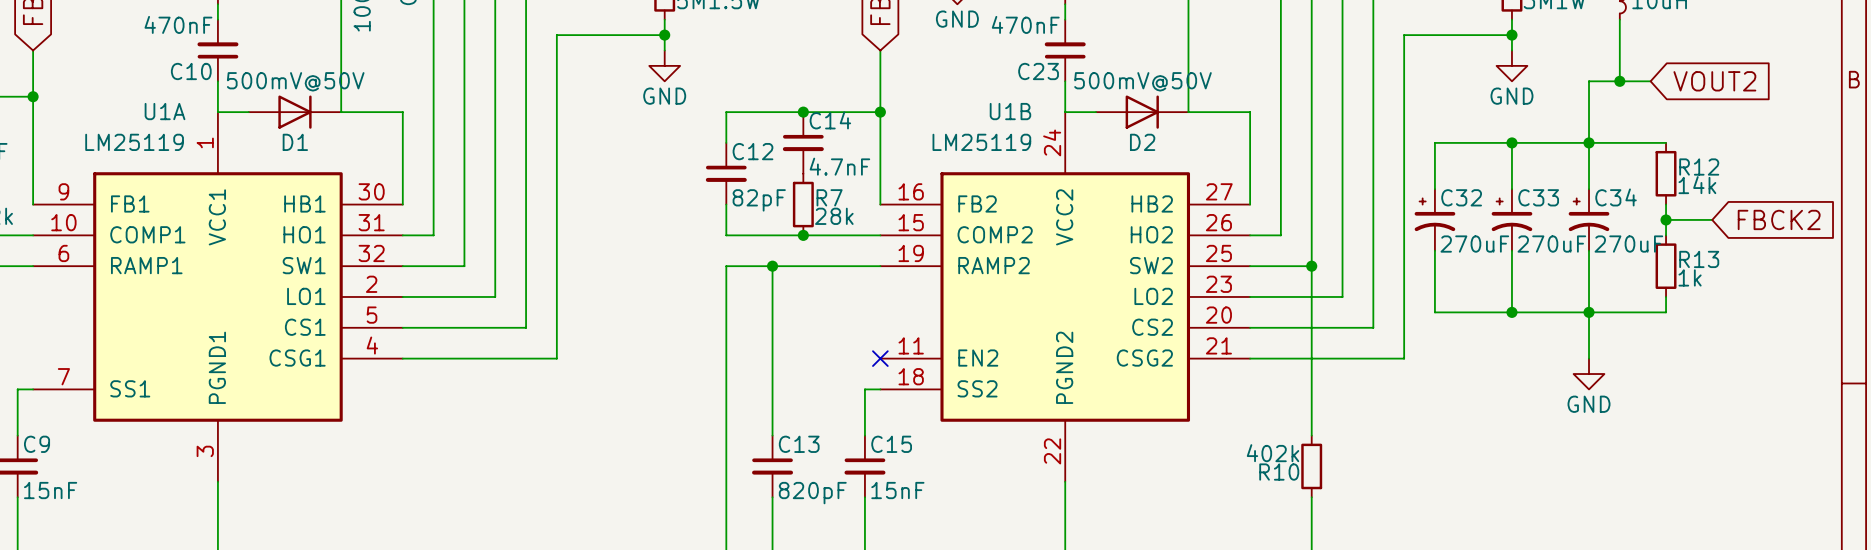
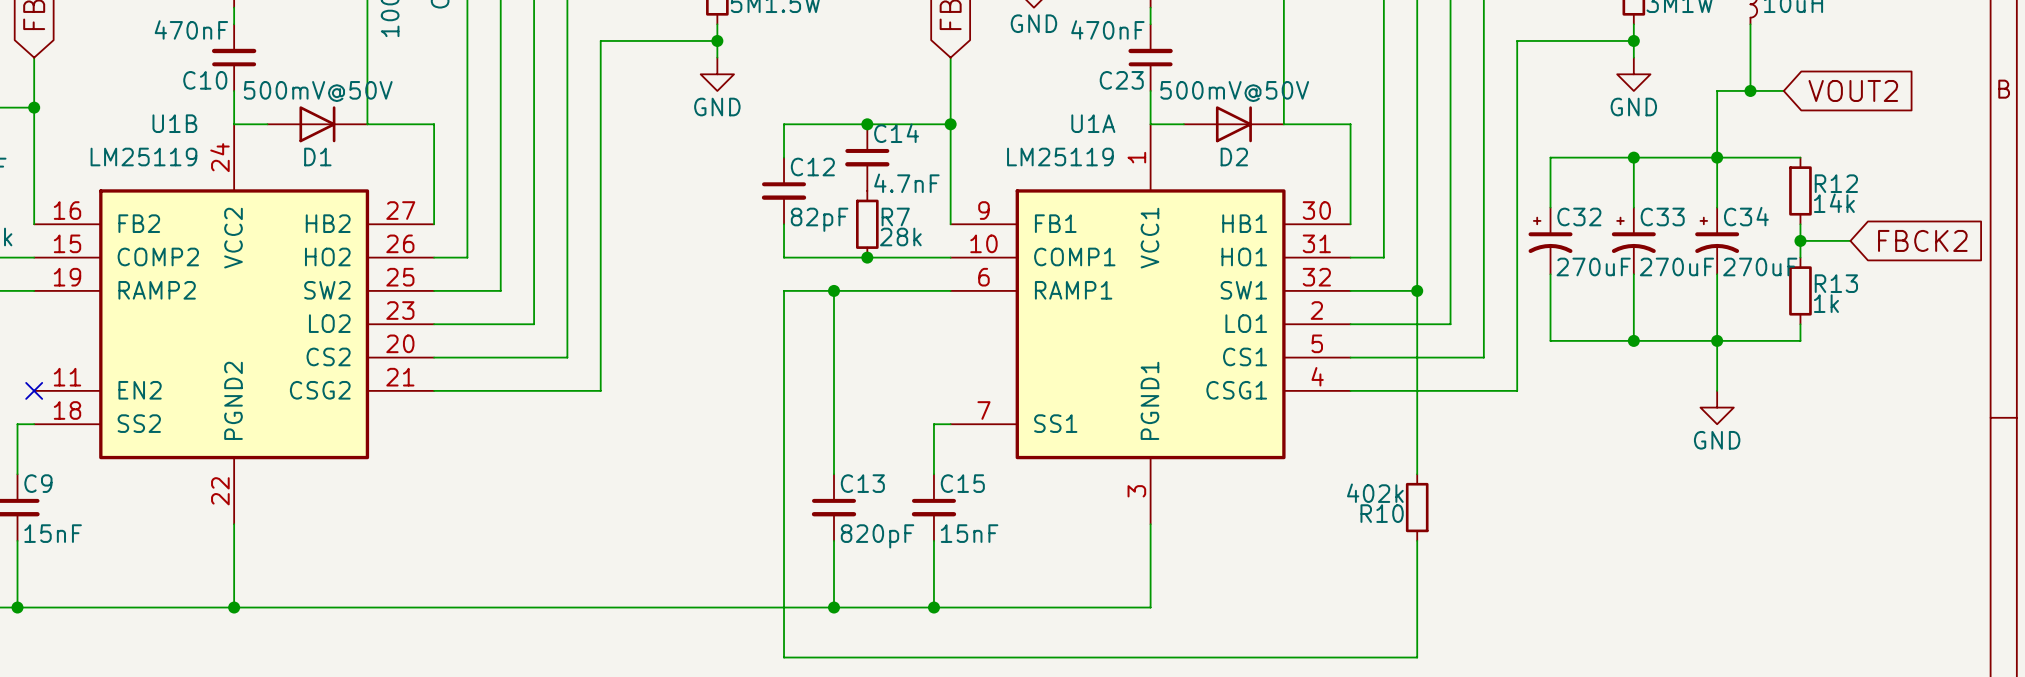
U1A position: (217, 296) -> (1150, 324)
U1B position: (1065, 296) -> (234, 324)
no-connect mark: none -> (34, 390)
no-connect mark: (880, 358) -> none

